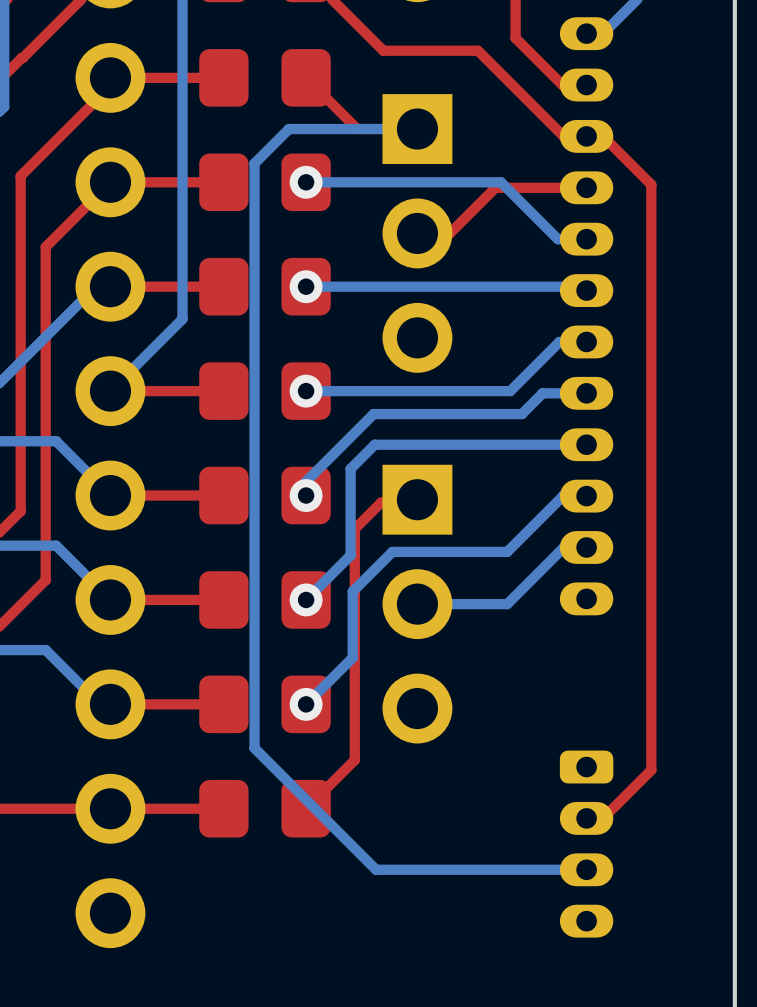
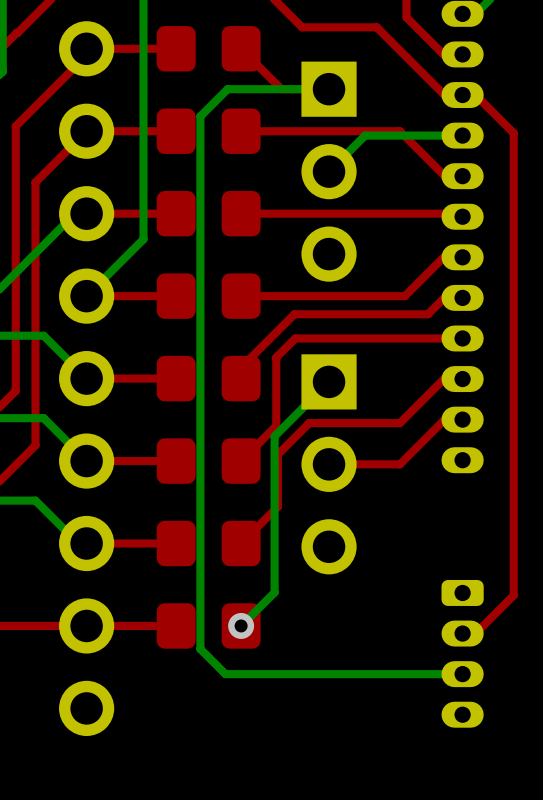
top track: none -> (241, 131) (399, 131) (444, 176) (462, 176)
bottom track: (306, 182) (500, 182) (557, 239) (586, 239) -> none
via: (306, 182) -> none
top track: (586, 187) (495, 187) (449, 233) (417, 233) -> none
bottom track: none -> (462, 135) (365, 135) (329, 171)
top track: none -> (241, 213) (459, 213) (462, 216)
bottom track: (306, 286) (582, 286) (586, 290) -> none
via: (306, 286) -> none
top track: none -> (462, 257) (443, 257) (404, 296) (241, 296)
bottom track: (586, 341) (559, 341) (510, 391) (306, 391) -> none
via: (306, 391) -> none
top track: none -> (462, 297) (444, 297) (427, 314) (294, 314) (241, 367) (241, 378)
bottom track: (586, 393) (542, 393) (521, 414) (373, 414) (306, 481) (306, 495) -> none
top track: none -> (462, 338) (295, 338) (276, 357) (276, 425) (241, 461)
bottom track: (586, 444) (374, 444) (350, 468) (350, 555) (306, 599) -> none
via: (306, 495) -> none
top track: none -> (462, 379) (444, 379) (399, 423) (309, 423) (277, 454) (277, 506) (241, 543)
bottom track: (586, 496) (563, 496) (507, 551) (392, 551) (352, 591) (352, 657) (306, 704) -> none
bottom track: none -> (329, 381) (274, 436) (274, 592) (241, 625)
top track: (421, 502) (381, 502) (354, 528) (354, 760) (306, 808) -> none
top track: none -> (462, 419) (444, 419) (399, 464) (329, 464)
bottom track: (586, 547) (563, 547) (507, 604) (417, 604) -> none
via: (306, 599) -> none
via: (306, 704) -> none
bottom track: (254, 748) (376, 869) -> (200, 578) (200, 649) (225, 674) (296, 674)
via: none -> (241, 625)

